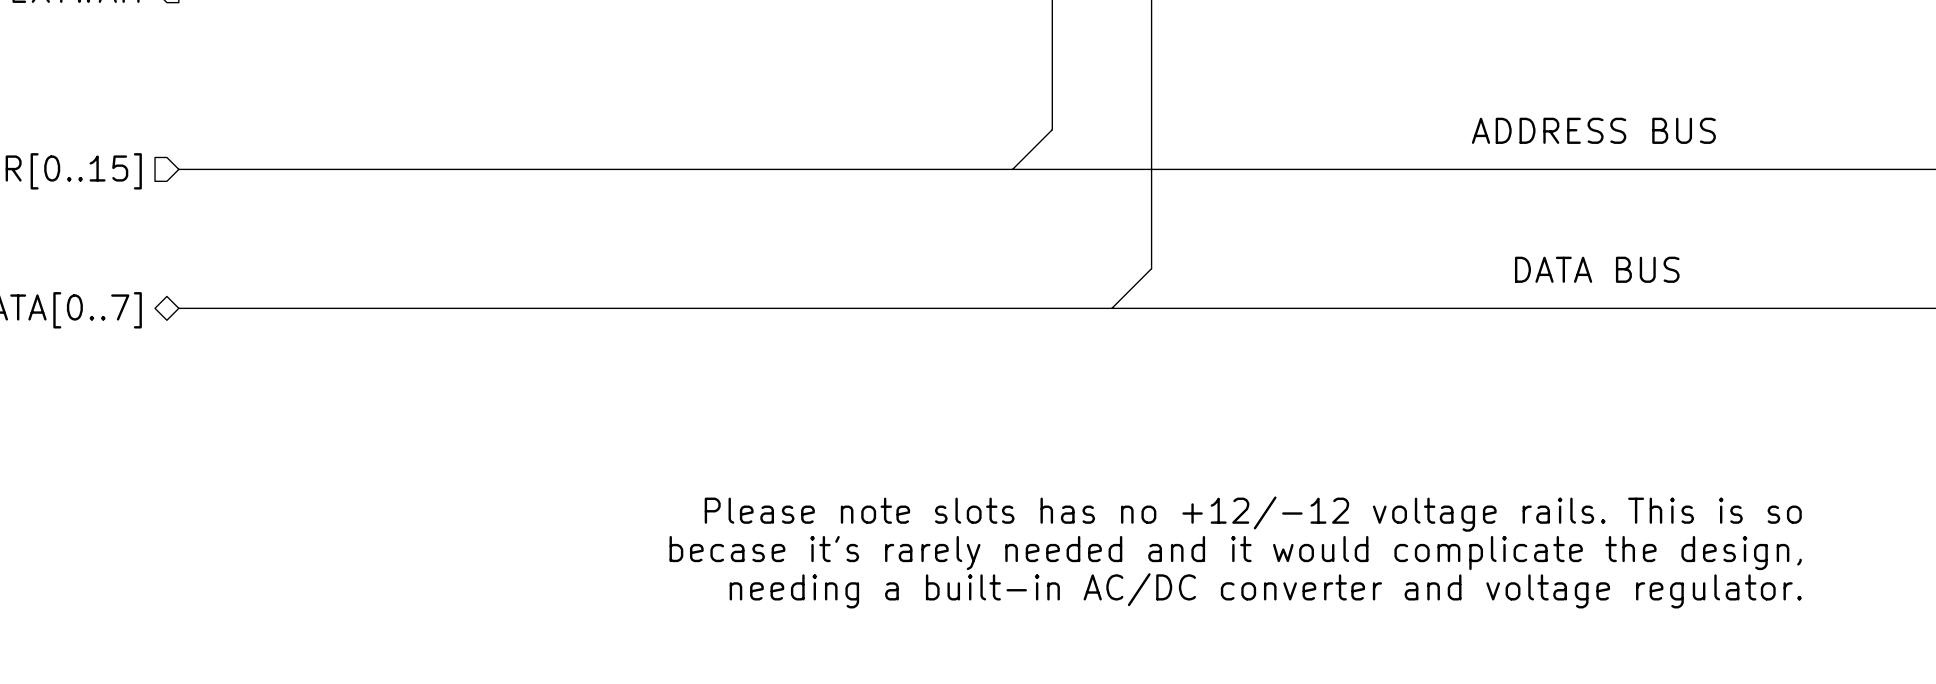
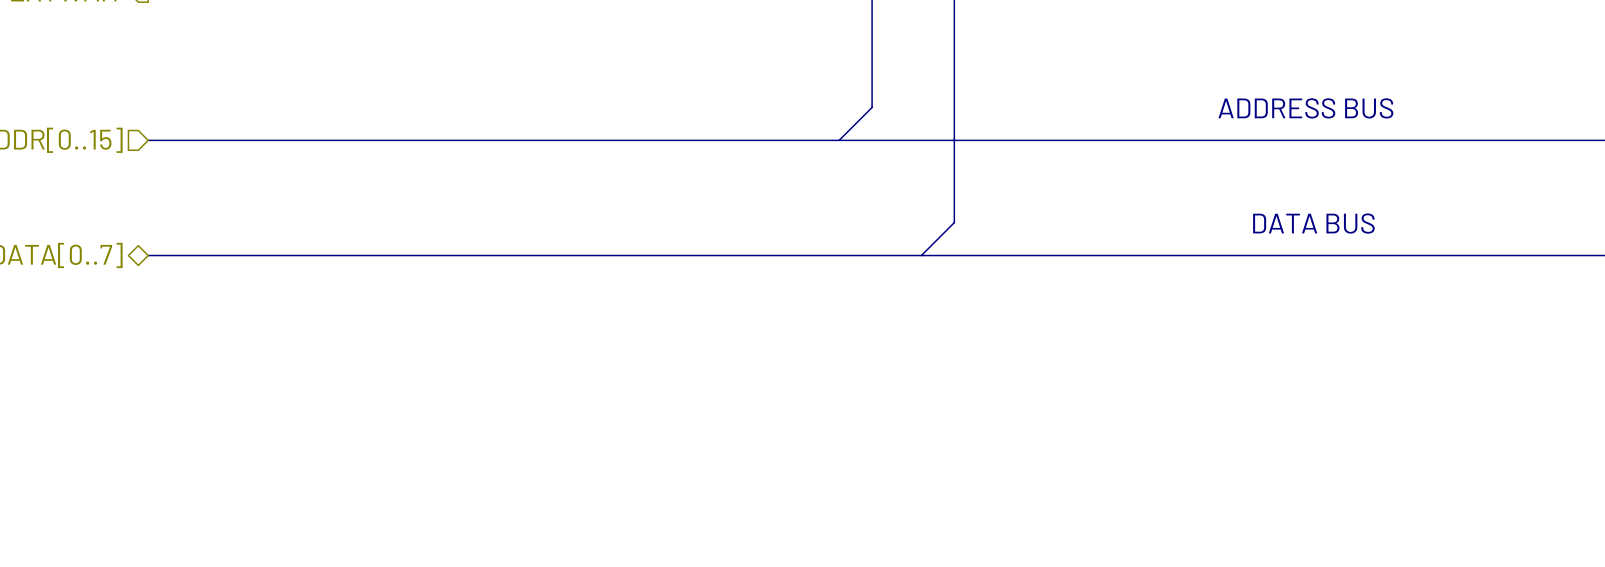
text: Please note slots has no +12/-12 voltage rails. This is so (1253, 514) -> none
text: becase it's rarely needed and it would complicate the design, (1235, 553) -> none
text: needing a built-in AC/DC converter and voltage regulator. (1265, 590) -> none

